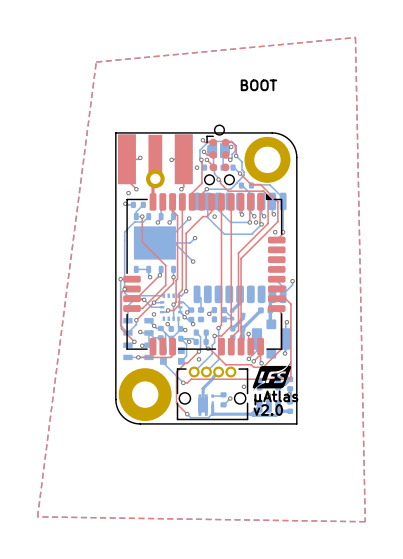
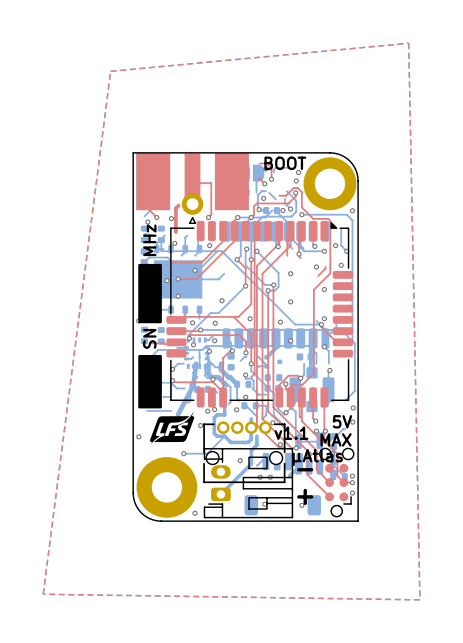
text position: BOOT (258, 85) -> BOOT (285, 163)
board edge: (272, 132) (287, 138) (294, 146) (296, 154) (296, 423) (137, 423) (127, 420) (121, 414) (115, 399) -> (313, 152) (333, 153) (344, 157) (353, 166) (357, 177) (358, 521) (155, 520) (141, 512) (134, 502) (133, 459)
via: (202, 140) -> none
bottom track: none -> (289, 166) (275, 167) (273, 172)
via: none -> (298, 172)
via: (204, 151) -> none
part: (219, 154) -> none
bottom track: (236, 155) (242, 161) (242, 169) (244, 171) (244, 175) (237, 182) -> none
via: (140, 157) -> none
via: none -> (296, 180)
via: (171, 159) -> none
top track: (201, 159) (201, 183) (192, 193) (192, 201) -> none
bottom track: (201, 159) (200, 150) (208, 141) (231, 141) (235, 145) (235, 151) (230, 159) -> none
via: (201, 159) -> none
top track: (206, 159) (213, 167) -> none
via: (206, 159) -> none
part position: (267, 159) -> (329, 183)
part: (155, 161) -> none
part: none -> (192, 188)
bottom track: none -> (266, 191) (261, 191) (258, 195) (258, 208) (266, 210)
bottom track: none -> (286, 191) (296, 200) (296, 211) (291, 216) (262, 216) (251, 228) (251, 231)
via: (197, 167) -> none
bottom track: (214, 167) (214, 174) (218, 179) -> none
part: (228, 167) -> none
top track: none -> (295, 192) (295, 196) (288, 203) (256, 203) (254, 206) (254, 214) (251, 217)
via: none -> (295, 192)
top track: none -> (279, 195) (286, 195) (293, 188) (297, 188) (301, 192) (301, 207) (313, 218) (328, 218) (329, 220)
via: none -> (263, 198)
bottom track: none -> (284, 198) (284, 203) (290, 209)
top track: (240, 173) (251, 184) (260, 184) (277, 201) (277, 221) (241, 258) (241, 346) -> none
via: (240, 173) -> none
top track: (218, 179) (228, 191) (263, 191) (268, 195) (268, 223) (238, 253) (238, 330) (231, 337) (231, 346) -> none
via: (218, 179) -> none
bottom track: none -> (153, 207) (144, 216)
via: none -> (290, 209)
via: none -> (259, 209)
part: none -> (271, 210)
via: none -> (282, 210)
via: none -> (352, 210)
bottom track: (251, 184) (269, 184) (283, 198) (283, 232) -> none
part: (246, 185) -> none
bottom track: none -> (301, 214) (346, 214) (352, 220) (352, 341)
via: none -> (301, 214)
bottom track: none -> (251, 217) (240, 227) (240, 256) (237, 259)
via: none -> (251, 217)
via: none -> (171, 218)
top track: none -> (329, 220) (330, 273) (313, 289) (313, 373) (301, 385) (292, 385) (290, 387) (290, 408)
bottom track: none -> (291, 228) (291, 238) (304, 251) (324, 251)
bottom track: none -> (341, 228) (341, 245) (346, 251)
top track: none -> (223, 231) (223, 241) (201, 262) (172, 262)
top track: none -> (234, 231) (234, 241) (196, 279) (178, 279)
top track: none -> (279, 231) (279, 243) (256, 265) (256, 425) (279, 448) (285, 448)
top track: none -> (290, 231) (290, 245) (262, 273) (262, 419) (291, 448) (296, 448)
top track: (172, 201) (172, 210) (177, 215) (177, 279) (176, 302) (173, 304) -> none
top track: (182, 201) (182, 289) (179, 292) (179, 304) (173, 310) (168, 310) -> none
bottom track: (207, 201) (207, 217) (224, 234) (251, 234) (261, 224) -> none
top track: (211, 201) (211, 211) (206, 216) (202, 216) (186, 233) (186, 291) -> none
top track: (231, 201) (231, 326) (221, 335) (214, 335) -> none
part: none -> (144, 234)
via: (125, 203) -> none
part rotation: 0° (138, 204) -> 90° clockwise (161, 234)
text: none -> MHz (149, 240)
bottom track: none -> (161, 240) (161, 251) (221, 251) (295, 324) (321, 324)
bottom track: (218, 210) (230, 222) (249, 222) -> (251, 241) (251, 259)
via: none -> (174, 243)
via: none -> (209, 245)
via: none -> (335, 245)
top track: (142, 216) (142, 242) (165, 265) (165, 285) (142, 308) (131, 308) -> none
via: (142, 216) -> none
bottom track: (148, 216) (143, 222) (134, 222) (124, 232) (124, 292) (127, 295) (163, 295) -> none
via: (254, 216) -> none
via: (264, 216) -> none
via: (189, 218) -> none
bottom track: none -> (245, 251) (245, 265) (265, 285) (273, 285)
bottom track: none -> (256, 251) (278, 272) (278, 287) (274, 290) (268, 290)
via: none -> (256, 251)
via: none -> (324, 251)
via: none -> (346, 251)
via: none -> (299, 254)
via: (157, 222) -> none
via: (169, 222) -> none
via: (249, 222) -> none
via: (256, 222) -> none
part: none -> (144, 256)
via: (261, 224) -> none
top track: none -> (237, 259) (245, 268) (245, 286)
via: none -> (237, 259)
top track: none -> (251, 259) (251, 304) (238, 316) (179, 316) (176, 319)
via: none -> (251, 259)
bottom track: none -> (144, 262) (149, 257) (167, 257) (172, 262)
drawing: none -> [138, 263, 162, 324]
via: none -> (341, 265)
via: (283, 232) -> none
via: none -> (195, 270)
via: (195, 238) -> none
via: none -> (290, 273)
via: none -> (178, 279)
bottom track: (174, 243) (193, 261) -> none
via: none -> (166, 280)
top track: none -> (273, 285) (273, 407) (316, 450) (316, 469) (329, 482)
via: none -> (273, 285)
bottom track: none -> (245, 286) (218, 313) (210, 313) (189, 334) (189, 338)
via: none -> (245, 286)
via: none -> (324, 289)
top track: none -> (268, 290) (268, 411) (307, 450) (307, 474) (329, 496)
via: none -> (268, 290)
via: none -> (178, 296)
via: none -> (290, 301)
part position: (204, 274) -> (259, 314)
top track: (159, 275) (136, 298) -> none
via: (159, 275) -> none
top track: none -> (233, 316) (251, 334) (251, 363)
via: (150, 277) -> none
top track: (173, 277) (173, 283) (136, 320) -> none
via: (173, 277) -> none
via: none -> (250, 318)
via: none -> (324, 318)
bottom track: (120, 279) (120, 325) (127, 332) (136, 324) (136, 320) -> none
via: none -> (192, 322)
via: none -> (280, 322)
via: none -> (215, 323)
via: (292, 281) -> none
top track: none -> (321, 324) (321, 327) (336, 342) (342, 342)
via: none -> (321, 324)
top track: none -> (200, 329) (176, 331)
bottom track: none -> (200, 329) (341, 329) (354, 343) (354, 391) (345, 400)
via: none -> (200, 329)
top track: (131, 288) (125, 288) (121, 292) (121, 328) (134, 341) -> none
via: (124, 289) -> none
part: none -> (144, 335)
top track: none -> (188, 335) (239, 335) (245, 341) (245, 352)
via: (186, 291) -> none
part: none -> (161, 335)
text: none -> SN (149, 338)
via: none -> (189, 338)
via: none -> (214, 340)
via: none -> (290, 340)
top track: (276, 298) (285, 298) (290, 304) (290, 377) (288, 379) (191, 379) (187, 382) (183, 382) -> none
via: (144, 299) -> none
via: none -> (193, 344)
bottom track: none -> (324, 346) (328, 351) (328, 363)
via: none -> (324, 346)
via: (153, 302) -> none
bottom track: (180, 302) (183, 302) (191, 310) (187, 312) -> none
via: (173, 304) -> none
bottom track: none -> (209, 351) (208, 373) (211, 377) (218, 377) (226, 385)
via: none -> (209, 351)
top track: none -> (232, 350) (223, 358) (223, 397)
via: none -> (232, 350)
via: none -> (245, 352)
bottom track: (162, 307) (151, 307) (144, 299) (134, 299) (127, 305) (127, 320) -> none
drawing: none -> [138, 355, 162, 409]
top track: (276, 308) (281, 312) (281, 349) (263, 367) (253, 367) (251, 364) (225, 364) (208, 348) -> none
via: (168, 310) -> none
part: (219, 310) -> none
bottom track: (260, 310) (242, 328) (242, 337) -> none
via: (187, 312) -> none
via: (209, 313) -> none
via: (153, 314) -> none
part: (191, 314) -> none
bottom track: (243, 314) (243, 318) (232, 328) -> none
bottom track: none -> (144, 363) (158, 349) (202, 349) (206, 346) (308, 346) (316, 353) (316, 363)
bottom track: none -> (183, 363) (178, 363) (172, 369)
bottom track: none -> (251, 363) (251, 370) (273, 393) (273, 415) (286, 427)
via: none -> (251, 363)
bottom track: none -> (304, 363) (304, 374) (300, 378)
via: (184, 317) -> none
bottom track: none -> (193, 366) (196, 363) (193, 385) (178, 414)
part: (219, 319) -> none
bottom track: (148, 320) (171, 338) (180, 328) -> none
bottom track: none -> (220, 368) (220, 363) (220, 369) (236, 384)
via: none -> (172, 369)
via: (167, 324) -> none
via: (193, 324) -> none
via: (154, 325) -> none
bottom track: none -> (245, 374) (245, 378) (253, 380) (252, 388) (258, 394) (266, 394)
via: none -> (245, 374)
part: (175, 328) -> none
bottom track: (218, 328) (218, 359) (206, 372) -> none
via: (218, 328) -> none
top track: none -> (300, 378) (298, 375) (288, 375) (279, 384) (279, 397)
via: none -> (300, 378)
top track: none -> (172, 380) (174, 382) (213, 382) (223, 392)
via: none -> (172, 380)
via: (140, 332) -> none
part: (201, 332) -> none
part: (160, 333) -> none
part: none -> (242, 384)
bottom track: (214, 335) (212, 353) (194, 372) -> none
via: (214, 335) -> none
part: (138, 339) -> none
via: (134, 341) -> none
via: (189, 341) -> none
bottom track: (196, 341) (192, 338) (180, 338) (186, 344) (186, 356) (181, 361) -> none
part: (201, 341) -> none
via: (142, 345) -> none
via: none -> (245, 397)
top track: none -> (301, 397) (301, 421) (337, 453) (337, 476) (343, 482) (352, 482)
top track: none -> (313, 397) (313, 418) (315, 421)
top track: none -> (324, 397) (324, 436)
top track: (172, 346) (172, 355) (170, 357) (138, 357) -> none
bottom track: none -> (221, 400) (224, 404) (224, 414) (217, 414) (214, 417) (214, 433) (217, 436) (224, 436)
via: (208, 348) -> none
top track: (198, 351) (176, 372) (176, 403) (187, 414) -> none
via: (198, 351) -> none
bottom track: none -> (278, 403) (278, 408) (284, 414)
bottom track: none -> (244, 405) (256, 416) (256, 421)
part: none -> (250, 405)
bottom track: none -> (255, 405) (266, 406) (266, 415) (262, 418)
via: (285, 353) -> none
top track: (260, 354) (253, 361) -> none
via: none -> (353, 407)
part: (172, 355) -> none
bottom track: none -> (290, 408) (295, 412) (295, 436) (301, 441) (325, 441) (334, 450) (334, 465) (344, 476)
via: none -> (214, 409)
via: none -> (236, 409)
via: (138, 357) -> none
via: none -> (207, 411)
via: (198, 359) -> none
bottom track: (163, 361) (183, 382) -> none
via: (253, 361) -> none
via: (261, 363) -> none
bottom track: none -> (251, 418) (251, 439) (248, 442) (230, 442) (224, 436)
via: none -> (315, 421)
text: none -> 5V (342, 421)
via: none -> (272, 422)
via: none -> (352, 422)
via: none -> (200, 425)
bottom track: (218, 372) (203, 388) (203, 405) -> none
bottom track: none -> (345, 429) (335, 436)
text: none -> v1.1 (291, 433)
drawing position: (271, 376) -> (172, 428)
via: none -> (138, 436)
bottom track: none -> (224, 436) (207, 453) (183, 453)
bottom track: none -> (256, 436) (256, 445) (251, 450) (251, 463) (220, 494)
via: (183, 382) -> none
text: none -> MAX (336, 439)
via: none -> (296, 448)
part position: (145, 394) -> (166, 487)
via: none -> (183, 453)
bottom track: (223, 394) (212, 396) -> none
via: (230, 398) -> none
part: (223, 399) -> none
via: none -> (240, 460)
part: (206, 405) -> none
text: none -> - (305, 469)
text: v2.0 (268, 410) -> none
bottom track: (290, 411) (283, 411) (278, 406) (278, 413) (276, 415) (212, 414) (212, 405) (212, 413) (208, 417) (190, 417) (187, 414) -> none
via: (187, 414) -> none
part: none -> (339, 476)
via: none -> (352, 476)
via: none -> (260, 477)
via: none -> (270, 477)
part: none -> (336, 482)
via: none -> (352, 482)
part: none -> (248, 483)
part: none -> (282, 484)
via: none -> (352, 493)
text: none -> + (305, 496)
via: none -> (264, 504)
via: none -> (301, 505)
via: none -> (195, 513)

